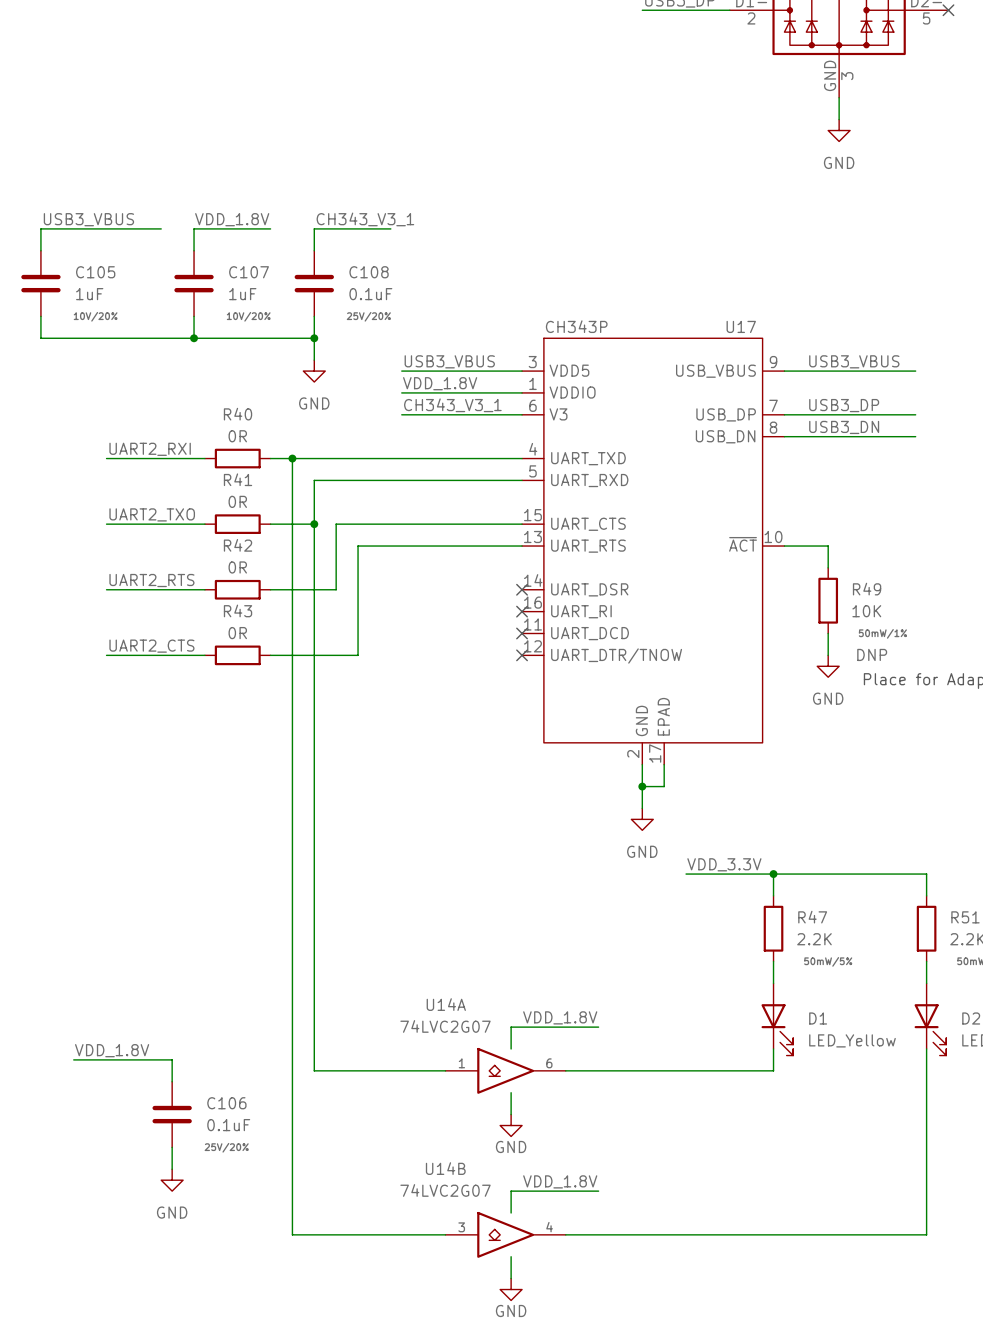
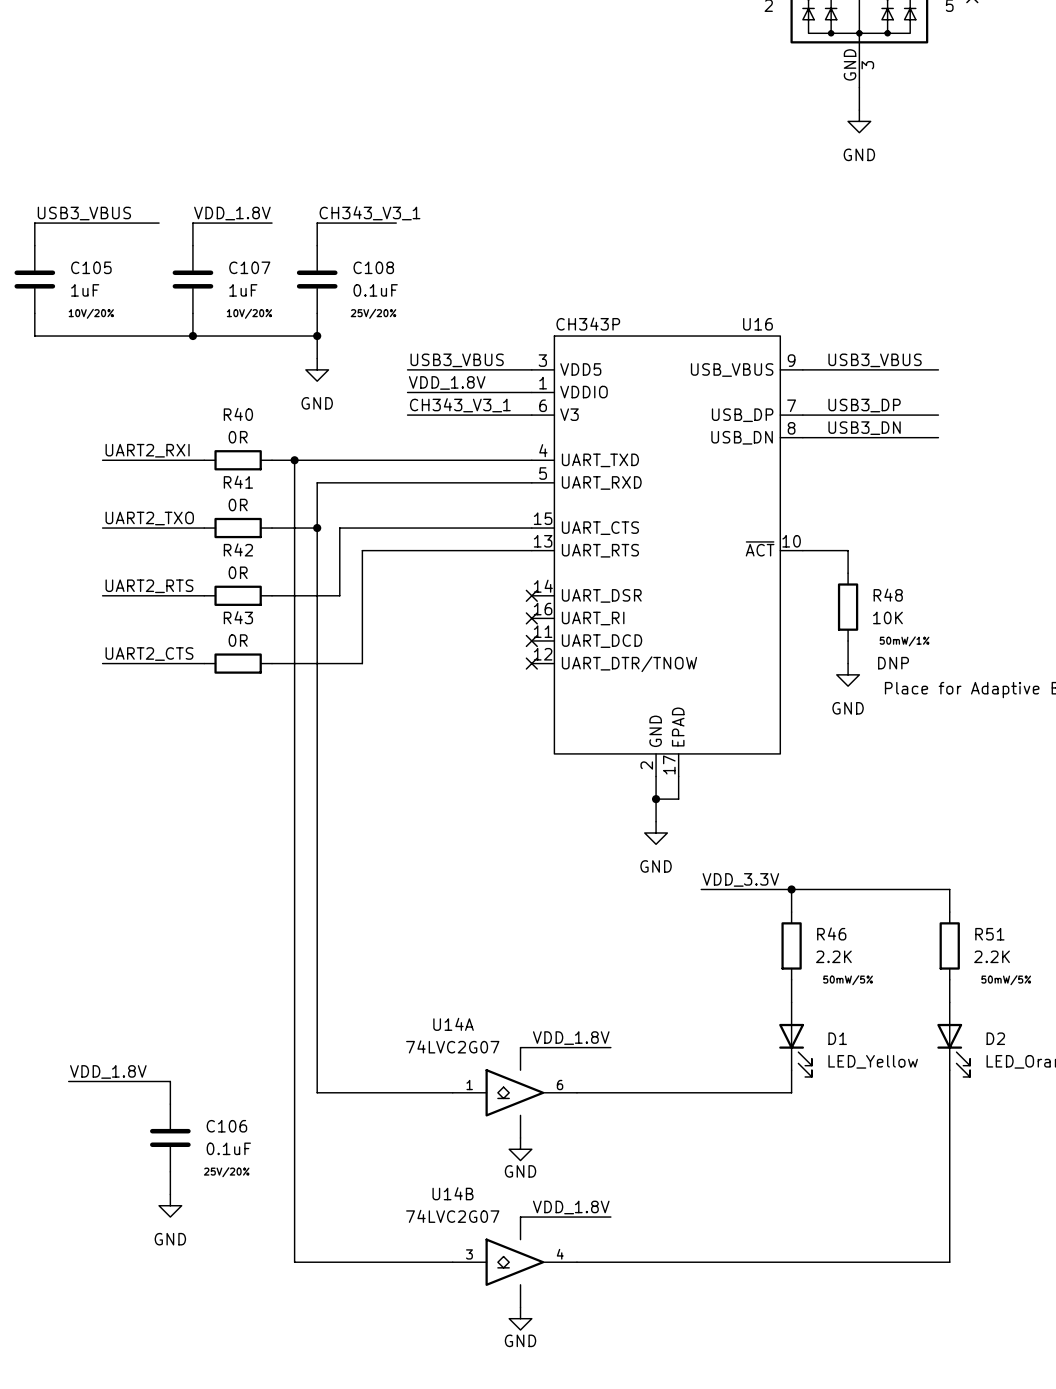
U17 name: U17 (741, 326) -> U16 (757, 324)
R49 name: R49 (867, 589) -> R48 (888, 595)
R47 name: R47 (812, 917) -> R46 (831, 933)

